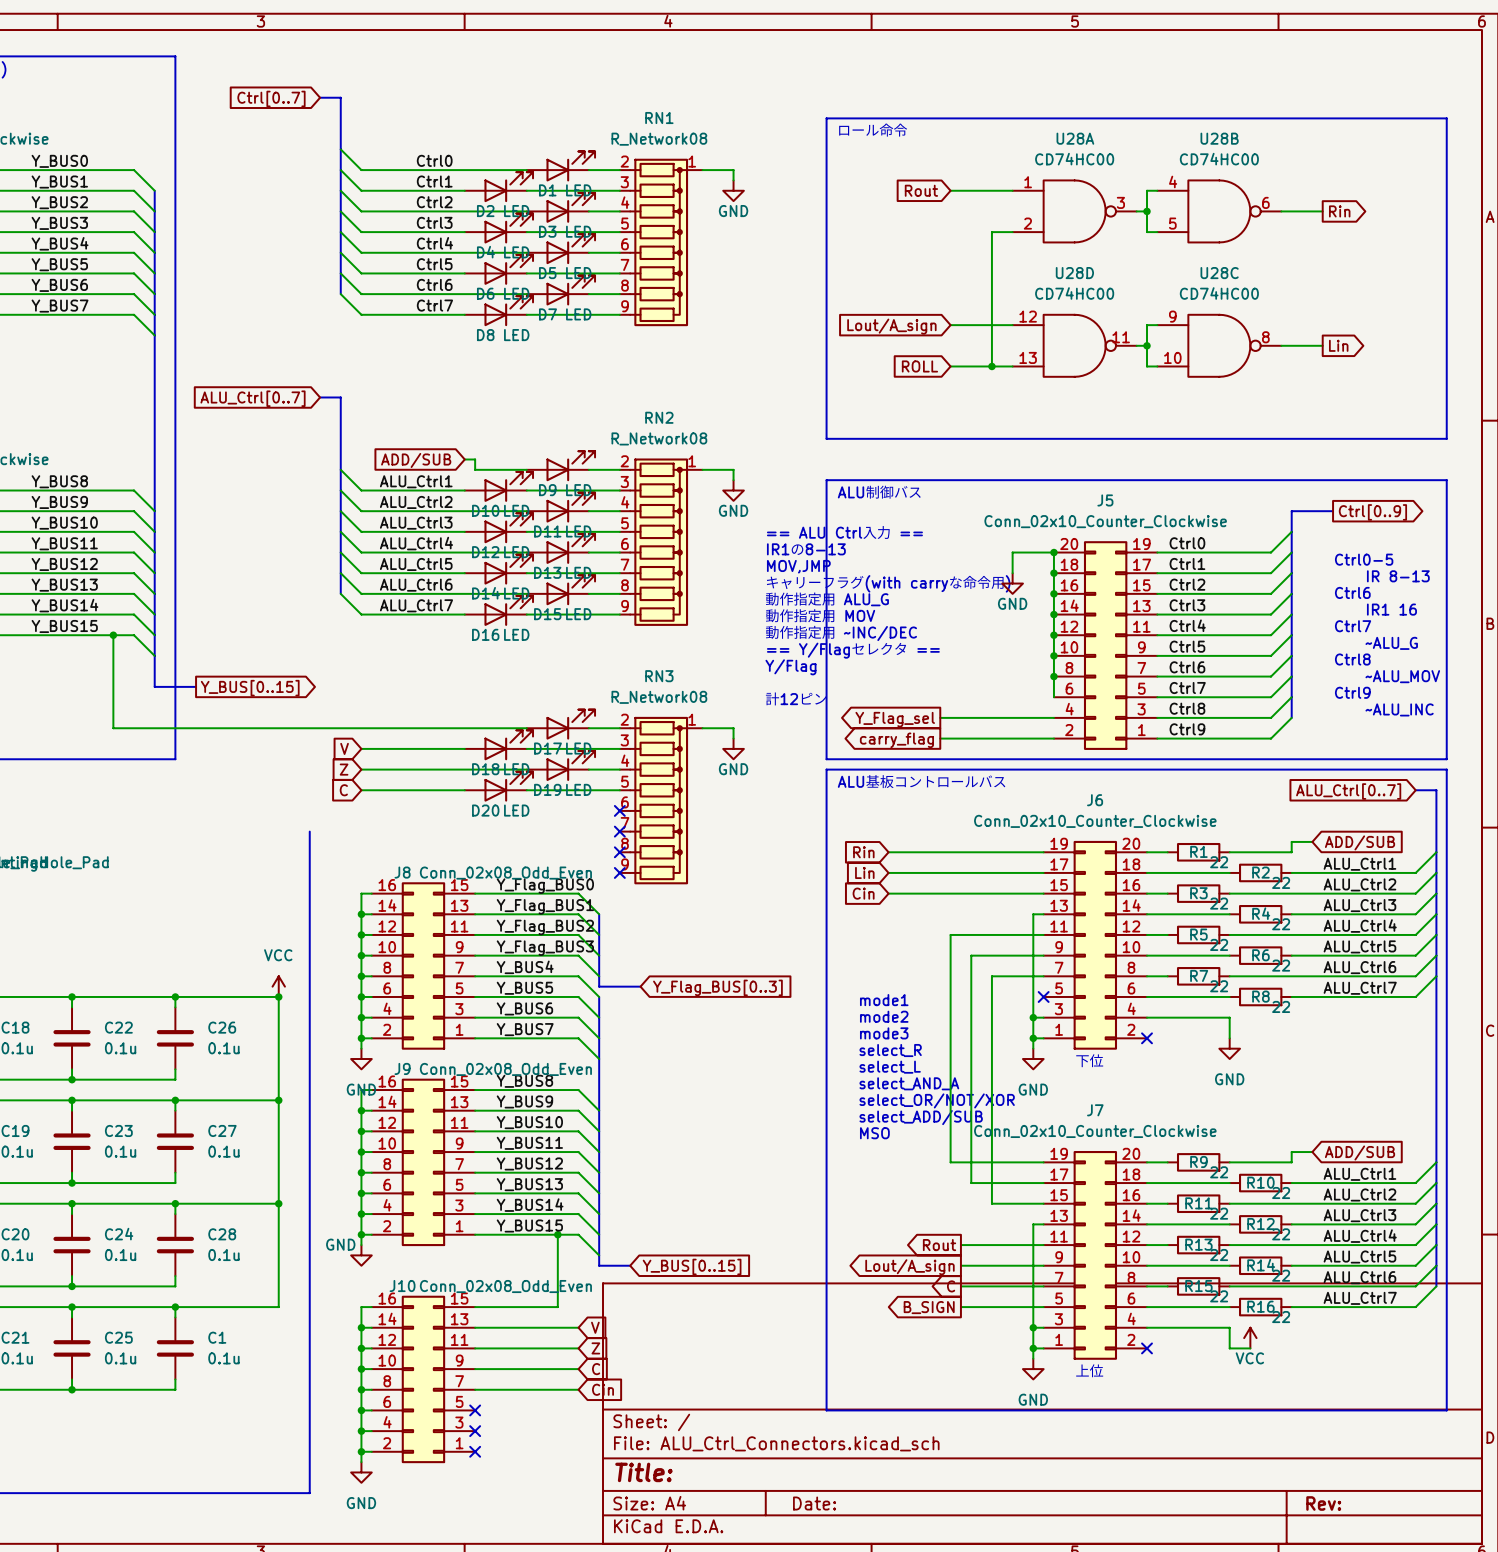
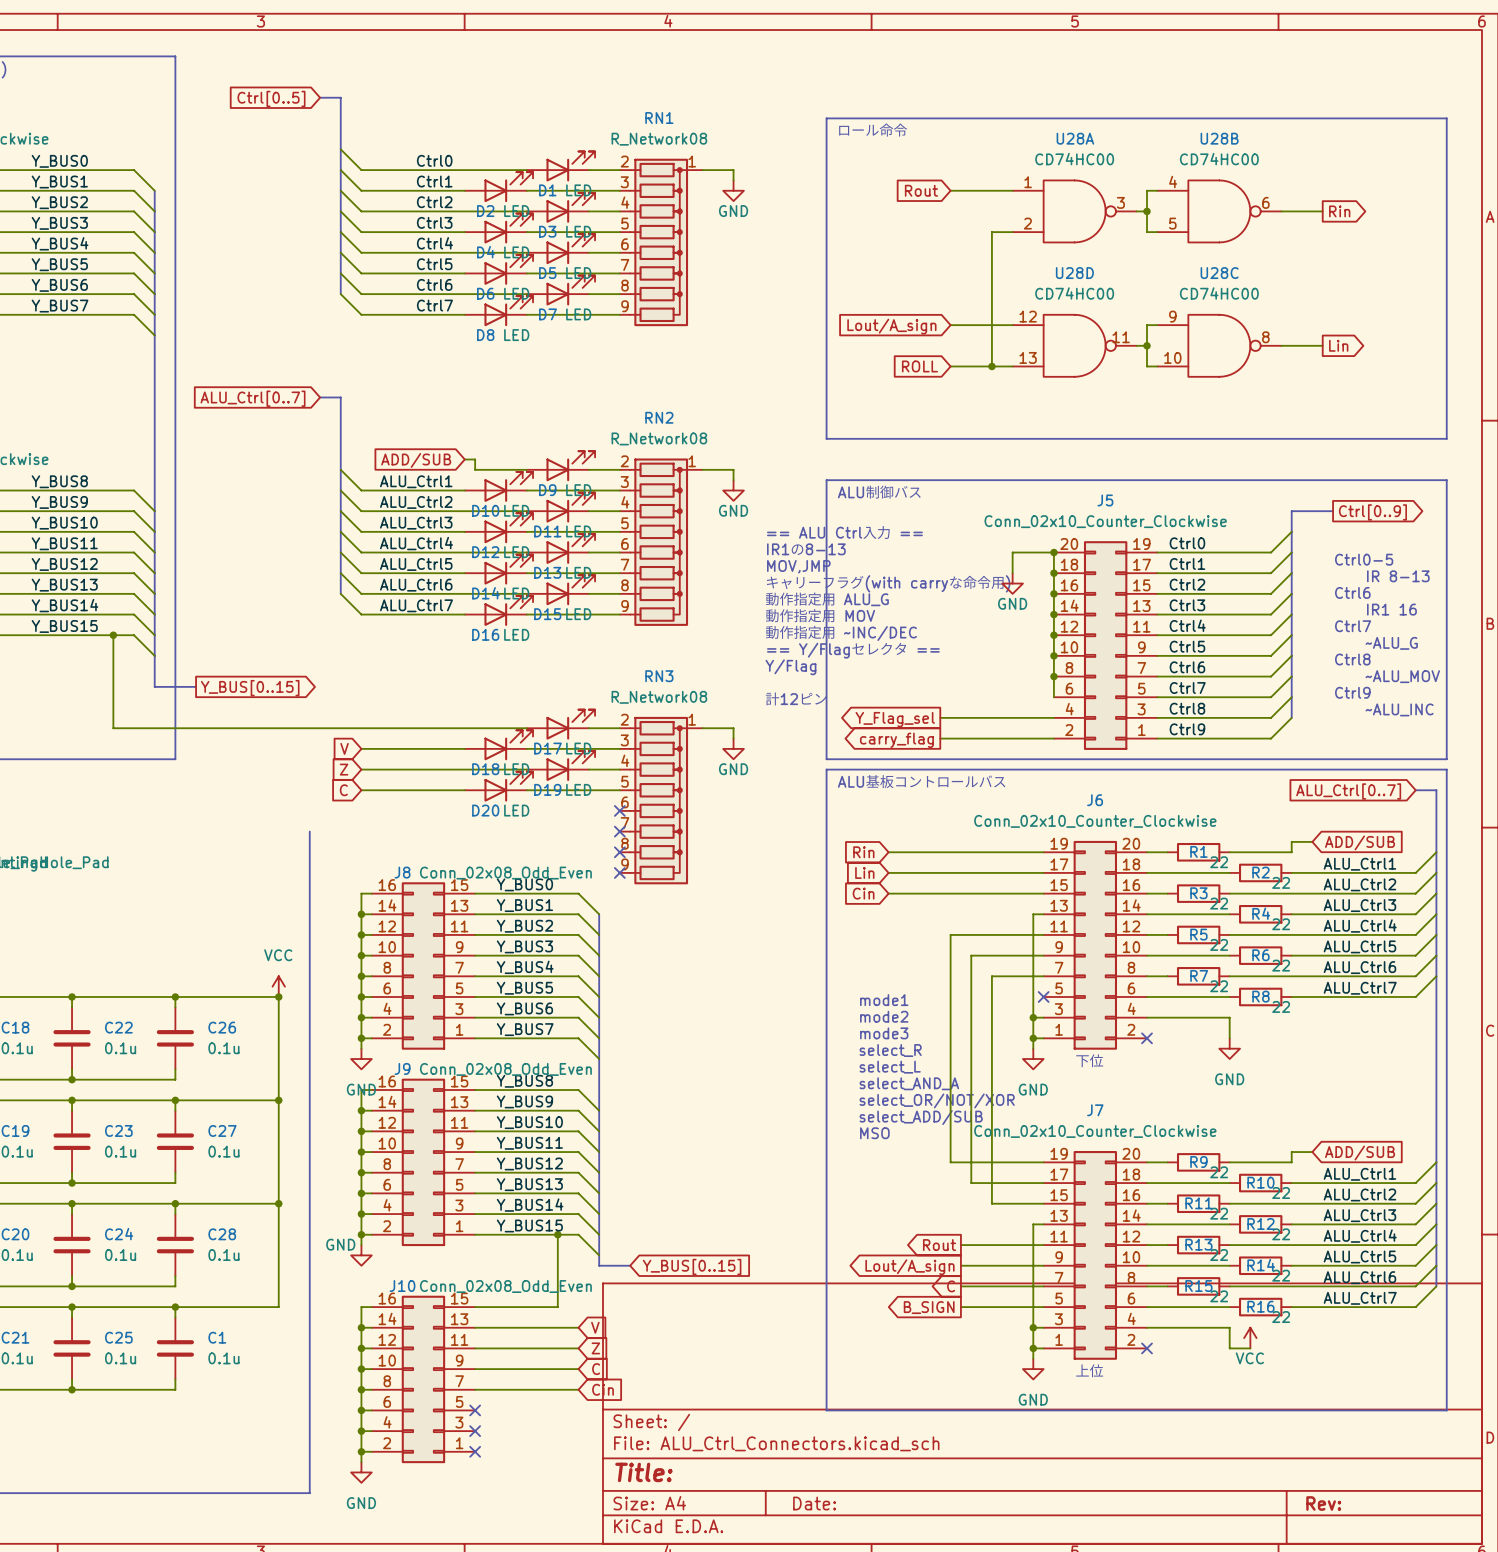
global label: Ctrl[0..7] (271, 98) -> Ctrl[0..5] (271, 98)
label: Y_Flag_BUS0 (545, 886) -> Y_BUS0 (524, 884)
label: Y_Flag_BUS1 (545, 906) -> Y_BUS1 (524, 905)
label: Y_Flag_BUS2 (545, 927) -> Y_BUS2 (524, 926)
label: Y_Flag_BUS3 (545, 948) -> Y_BUS3 (524, 946)
bus: (599, 986) (640, 986) -> (599, 986) (599, 996)
global label: Y_Flag_BUS[0..3] (717, 987) -> none

